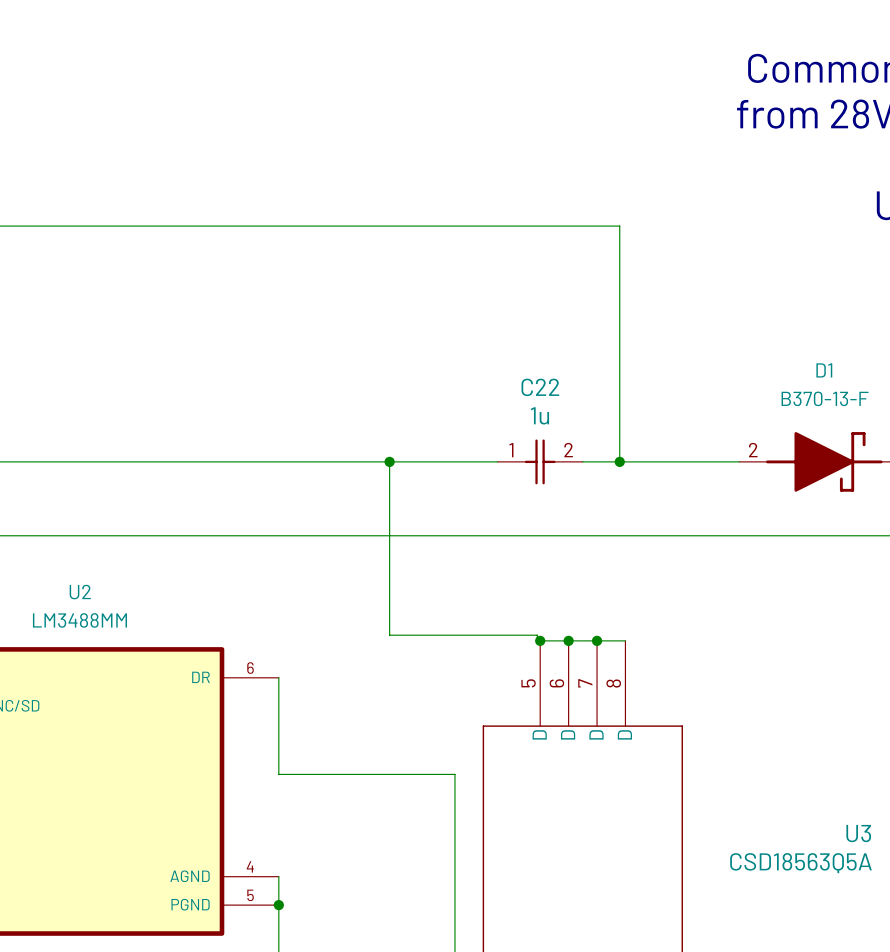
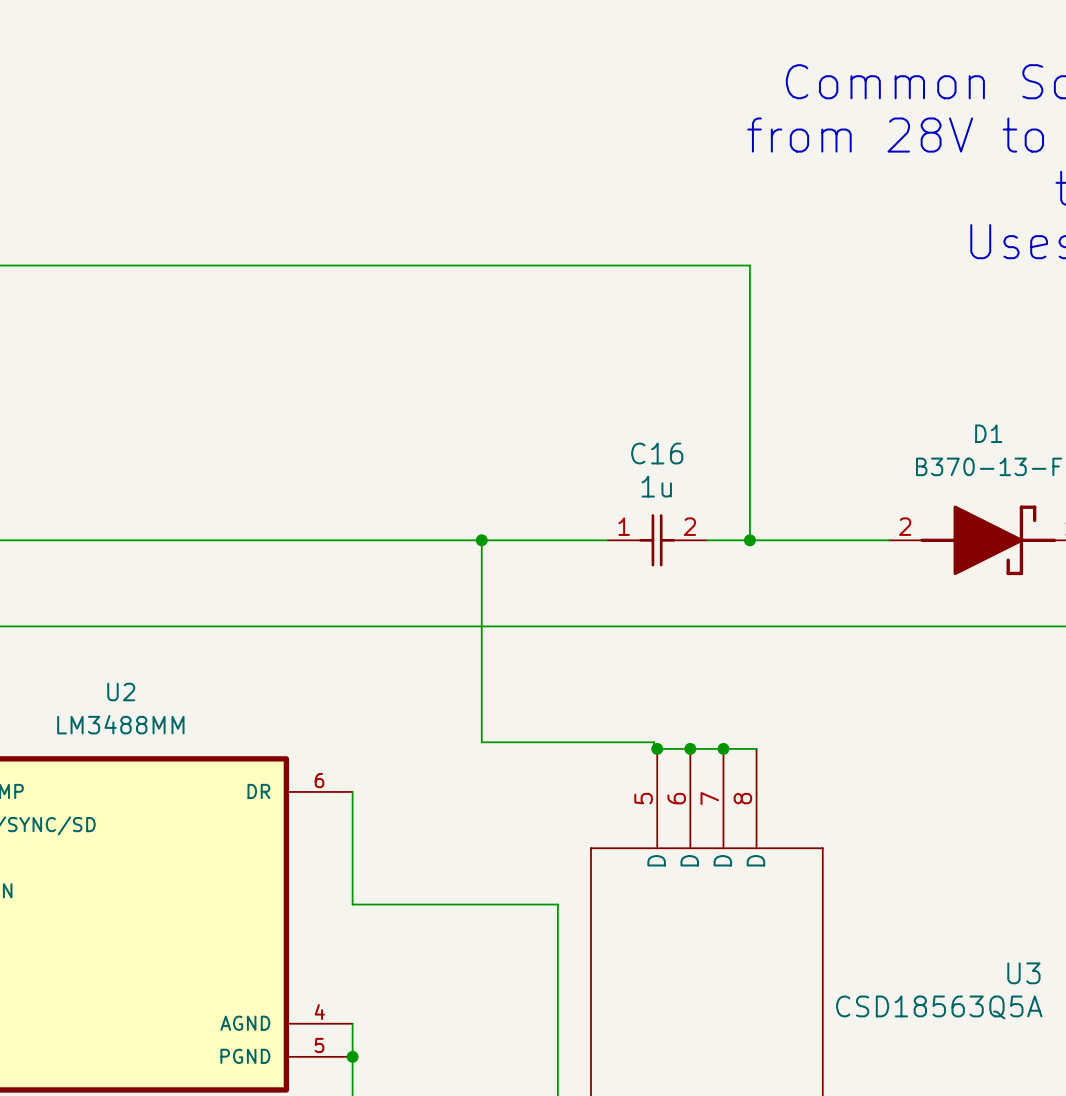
C22 name: C22 (540, 387) -> C16 (657, 453)

